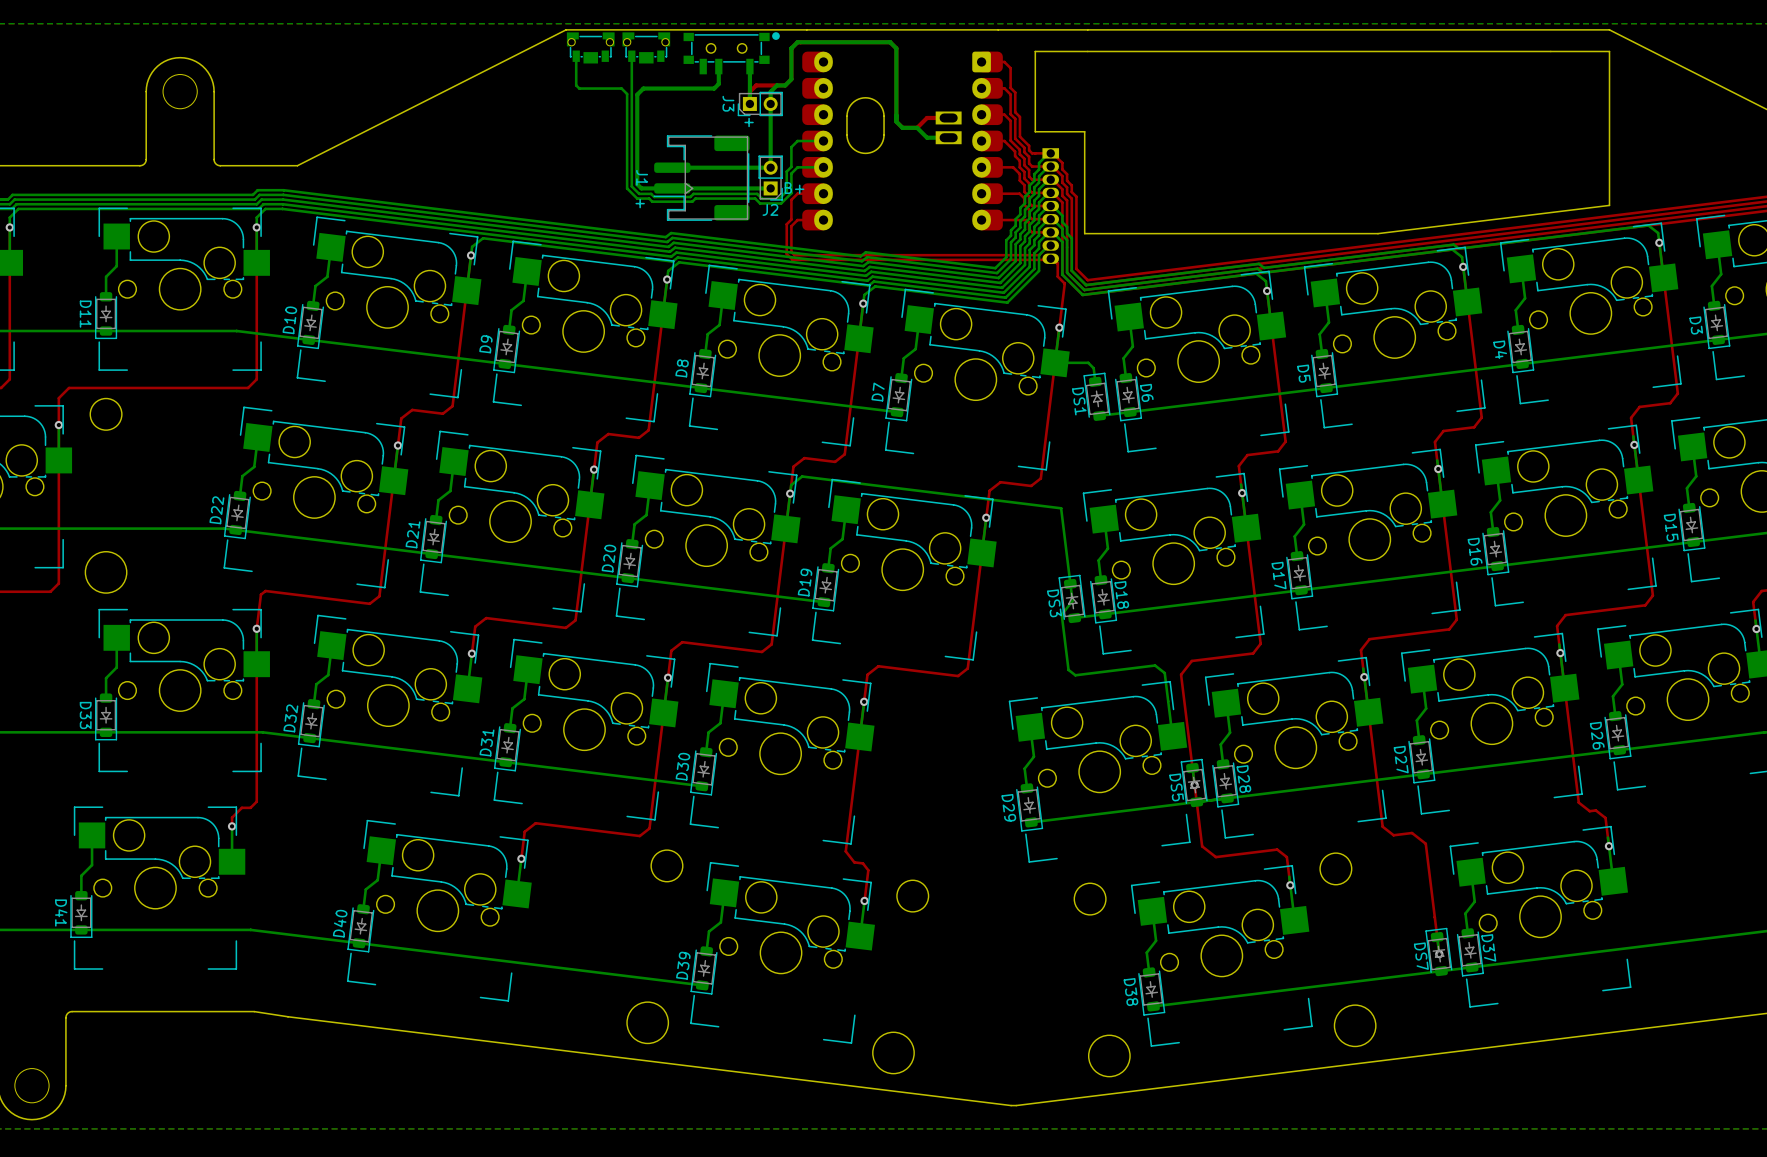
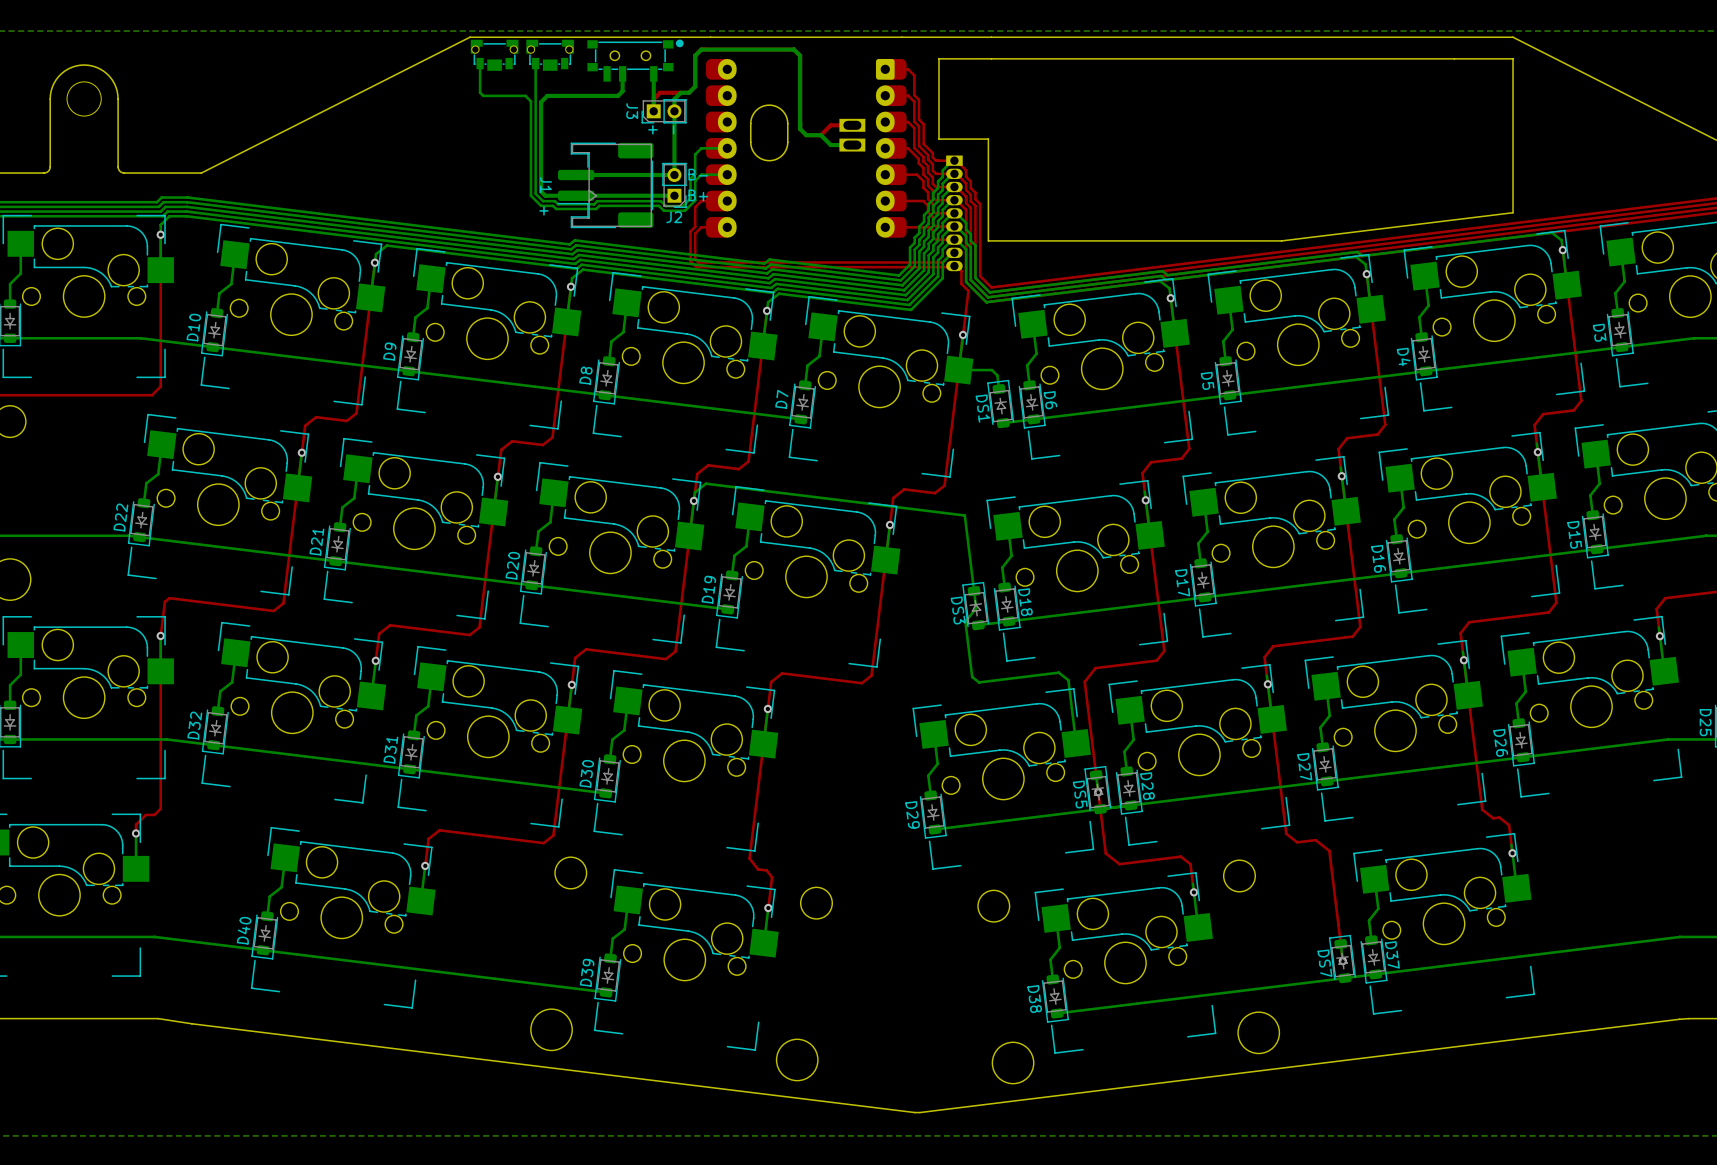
text: none -> - (673, 129)
text: none -> B- (698, 174)

